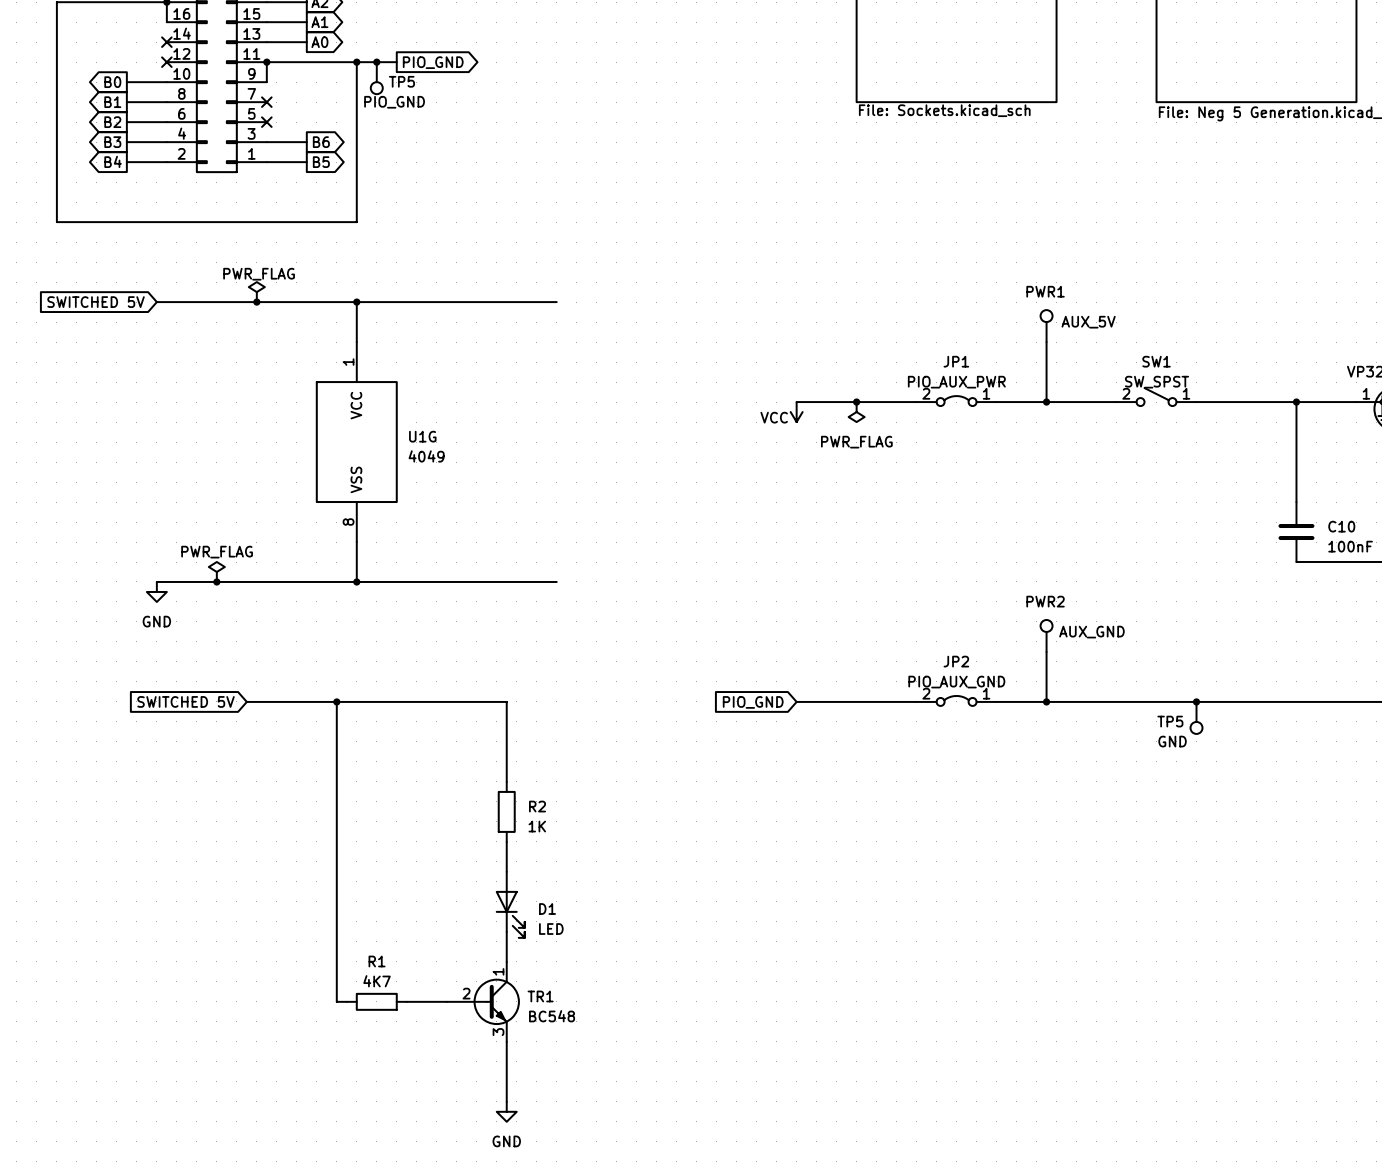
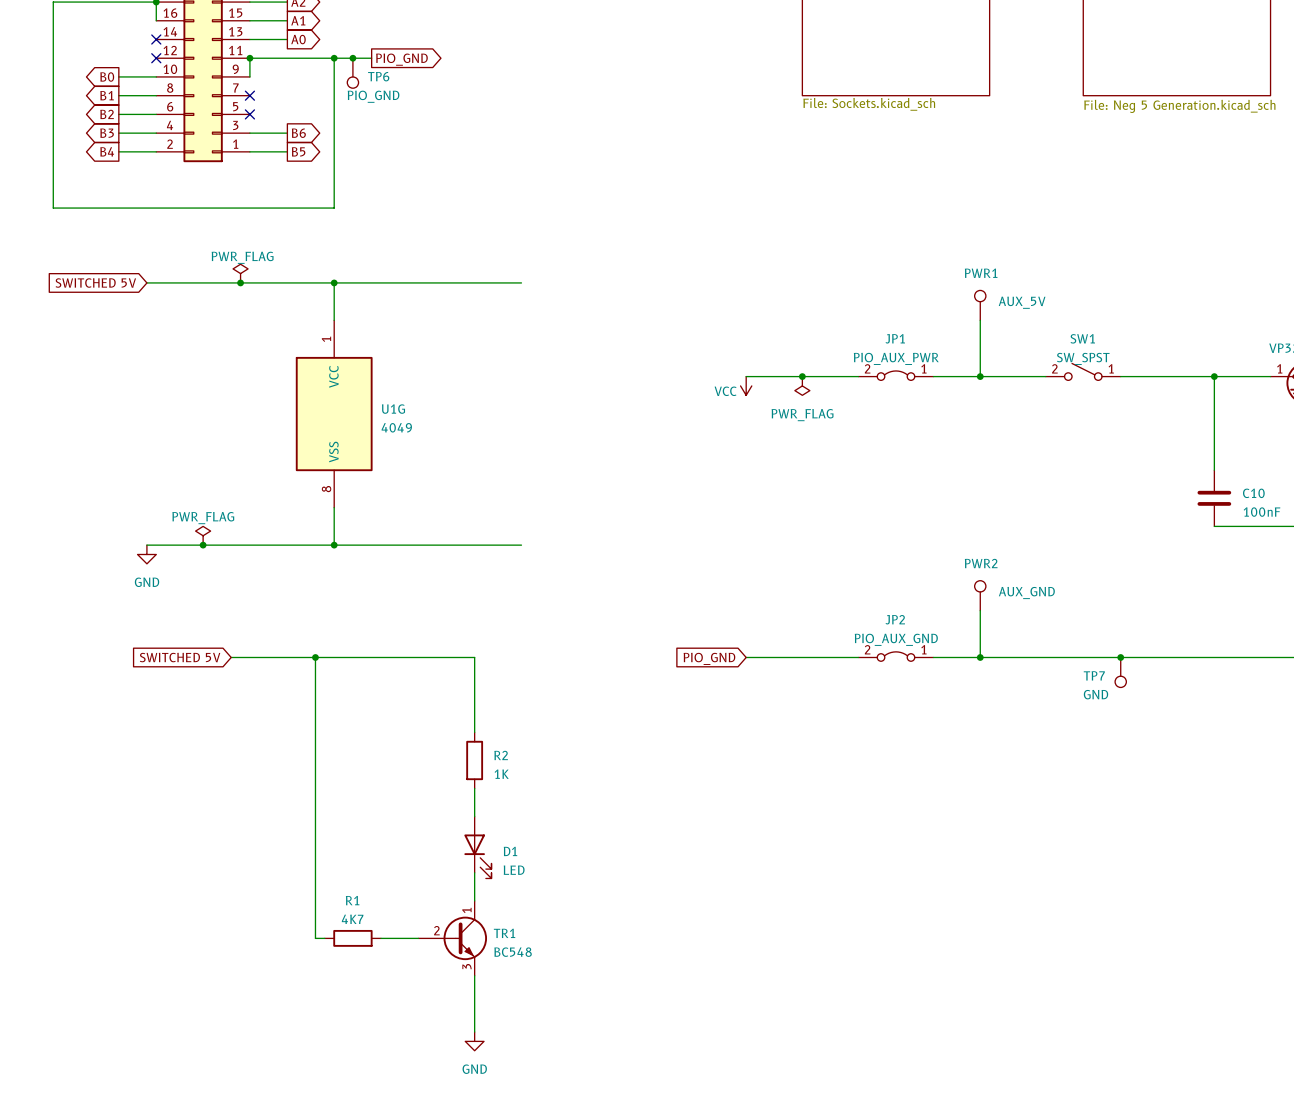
TP5 name: TP5 (401, 81) -> TP6 (378, 76)
TP5 name: TP5 (1170, 721) -> TP7 (1094, 675)

